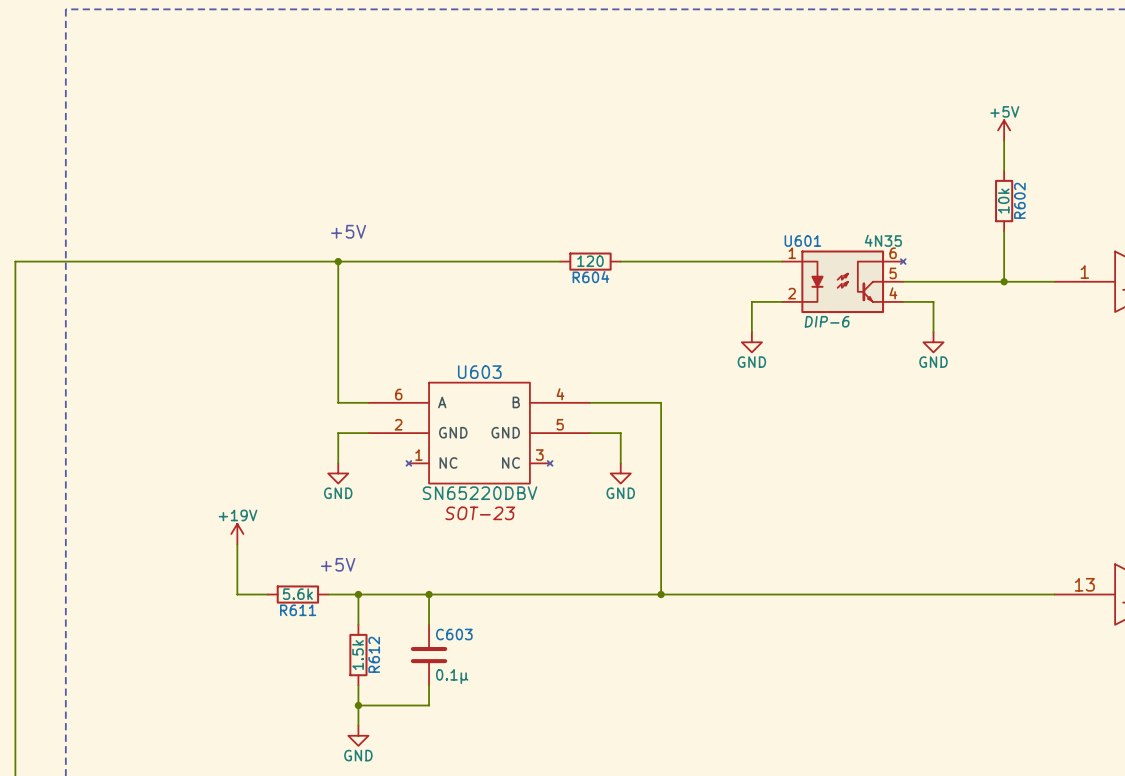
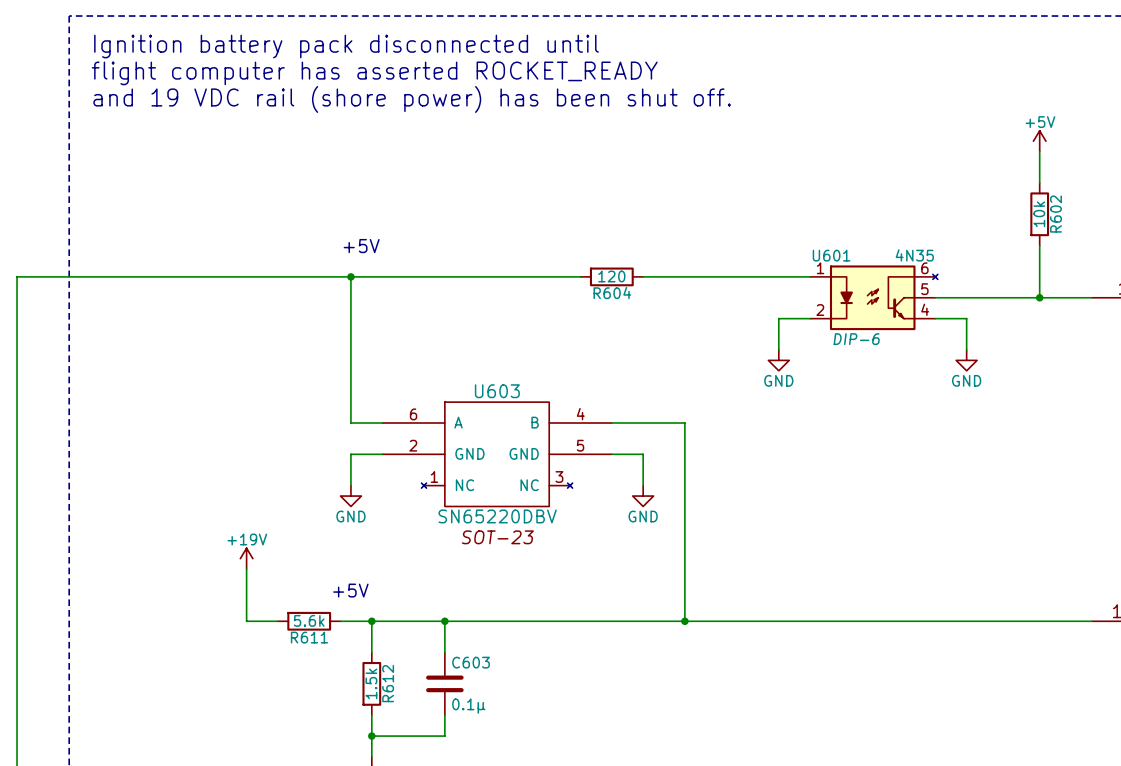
text: none -> Ignition battery pack disconnected until (346, 46)
text: none -> flight computer has asserted ROCKET_READY (374, 73)
text: none -> and 19 VDC rail (shore power) has been shut off. (412, 99)

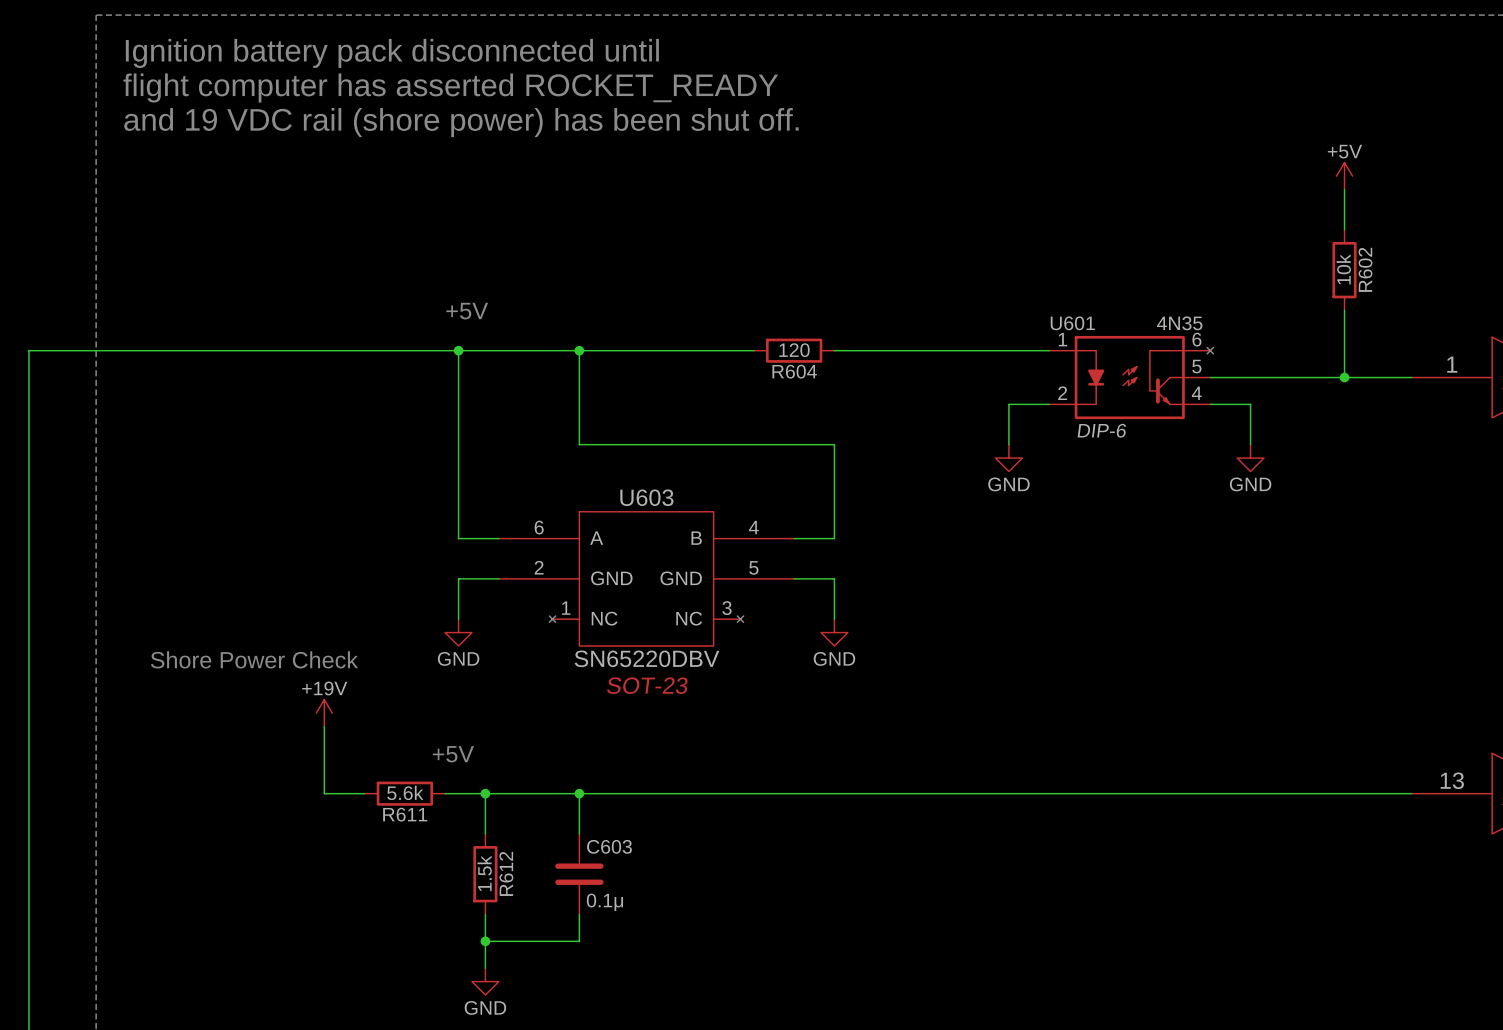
junction: none -> (579, 350)
wire: (643, 423) (684, 423) (684, 621) -> (834, 538) (834, 444) (579, 444) (579, 350)
text: none -> Shore Power Check (254, 659)
junction: (684, 621) -> none

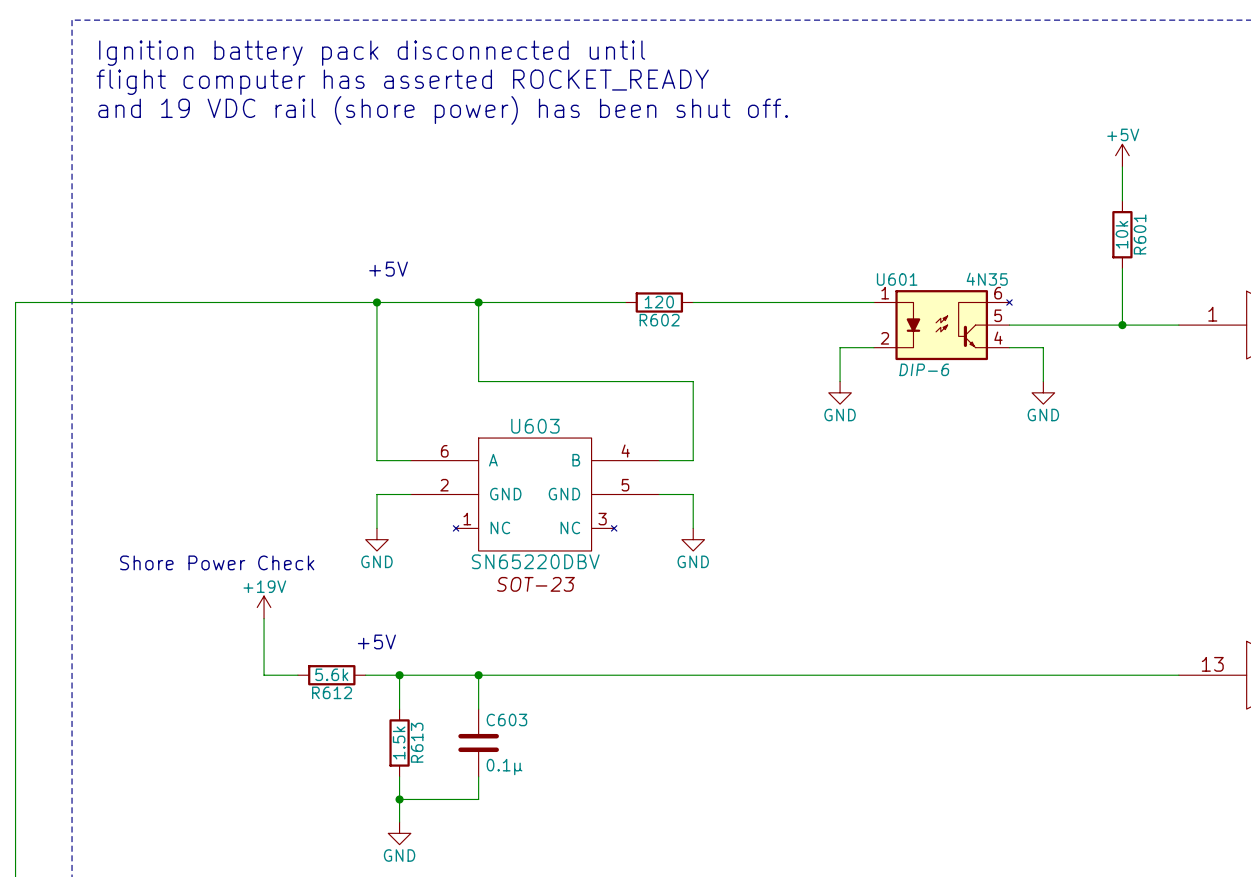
R602 name: R602 (1365, 269) -> R601 (1140, 234)
R604 name: R604 (794, 371) -> R602 (659, 320)
R611 name: R611 (405, 814) -> R612 (332, 692)
R612 name: R612 (506, 873) -> R613 (417, 742)

